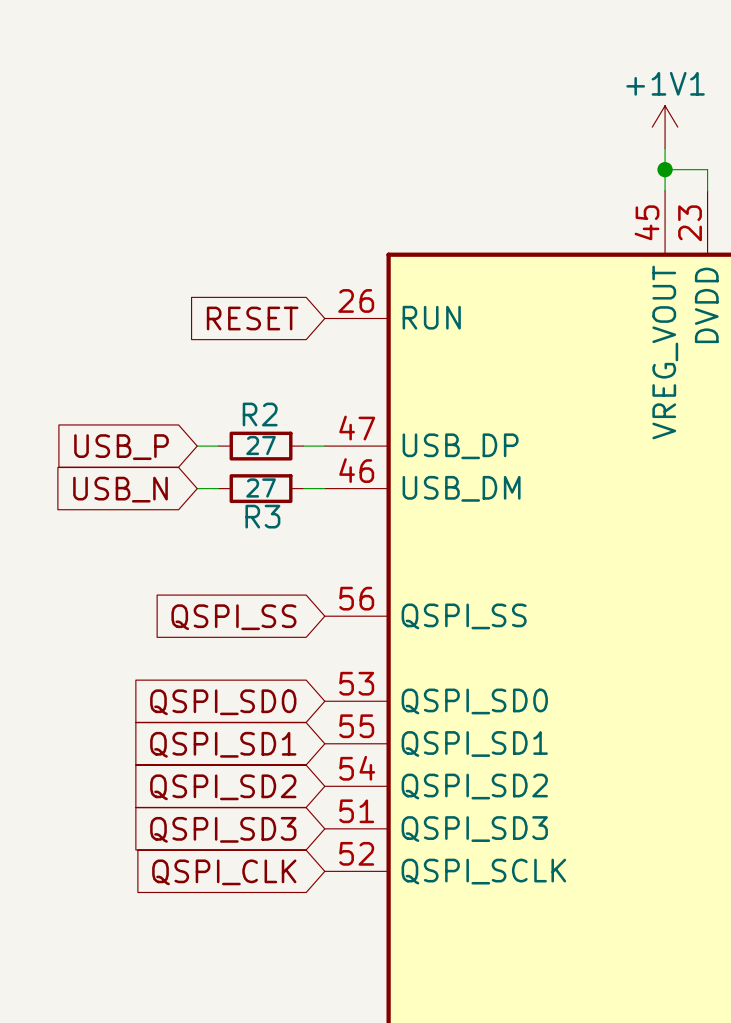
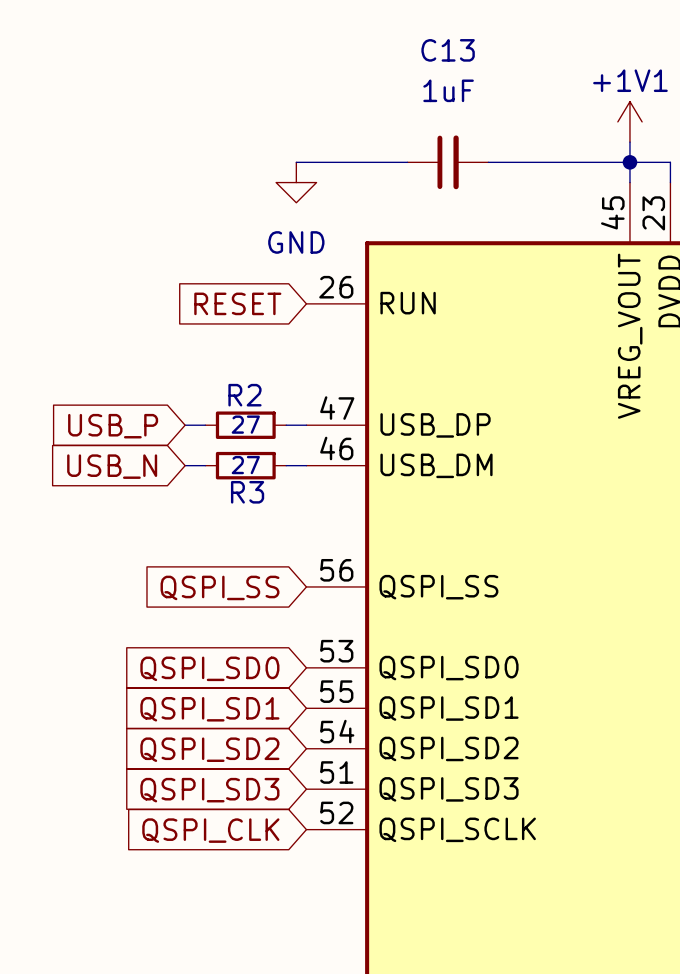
wire: none -> (296, 162) (407, 162)
C13: none -> 1uF (447, 162)
wire: none -> (488, 162) (629, 162)
power symbol: none -> GND (296, 182)

